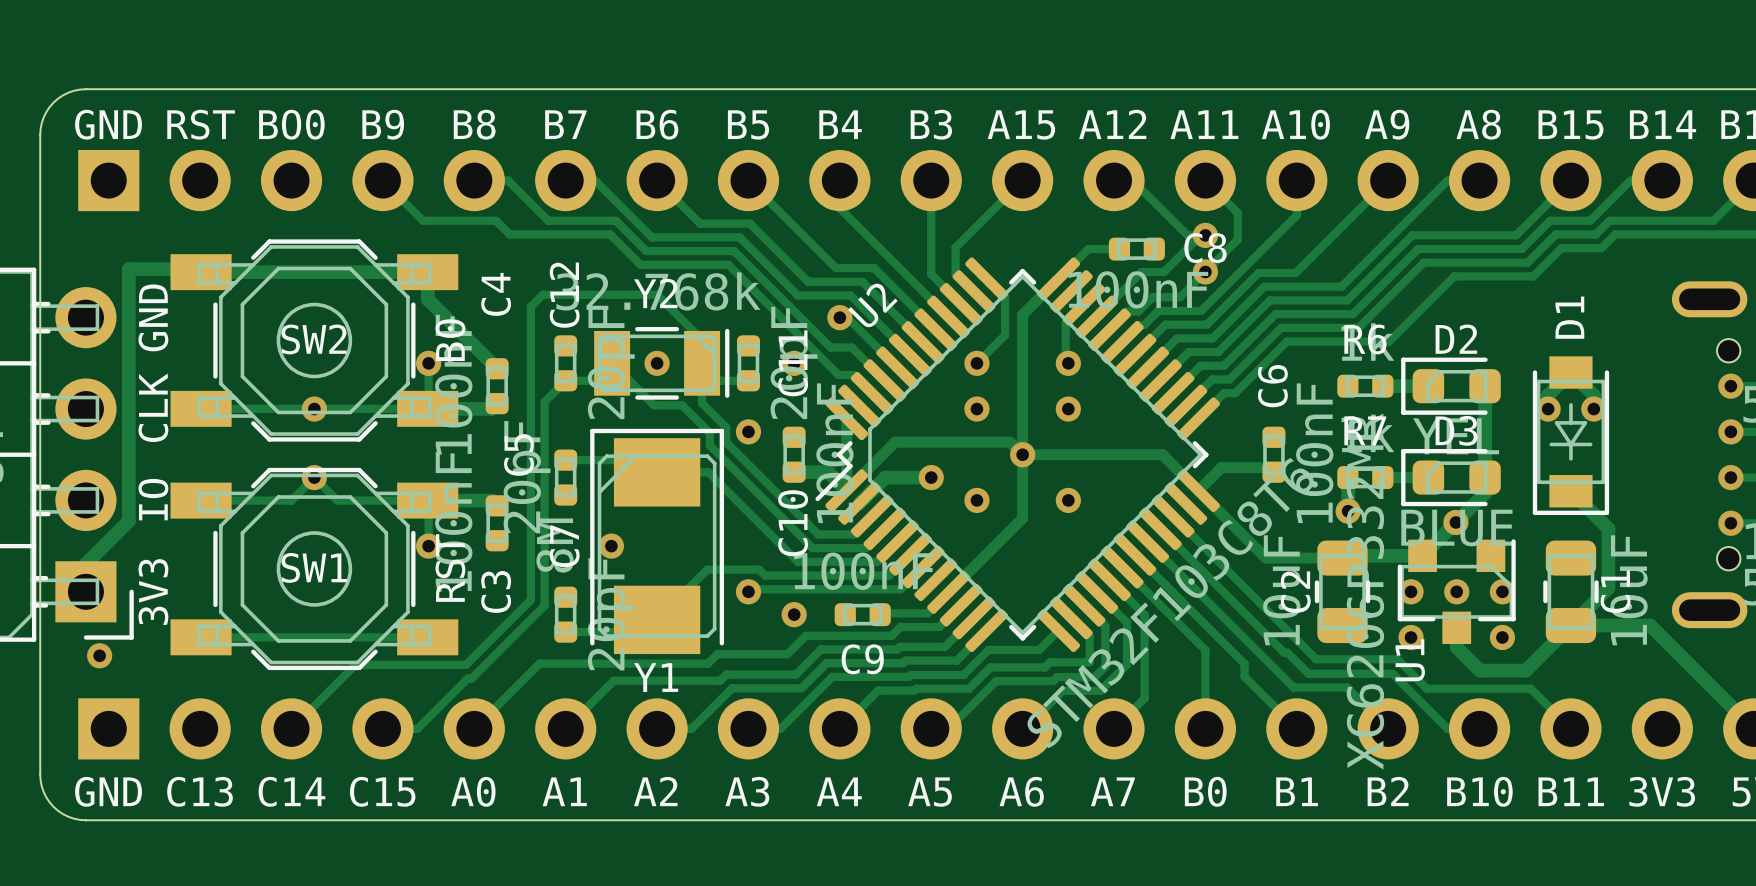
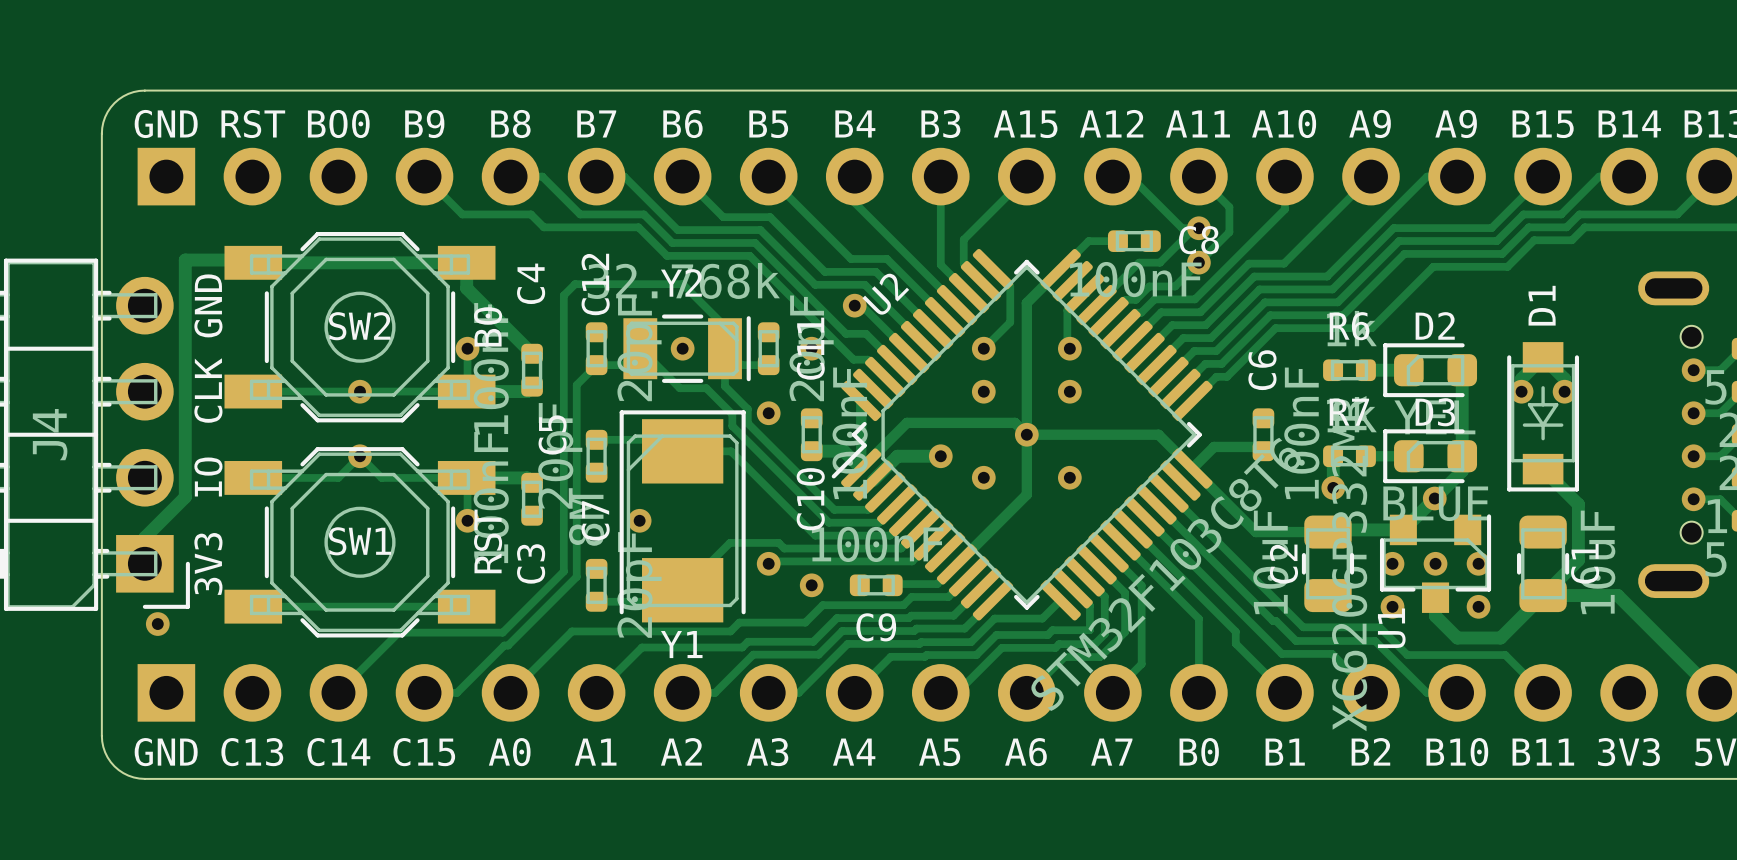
text: A8 (1478, 124) -> A9 (1456, 123)

